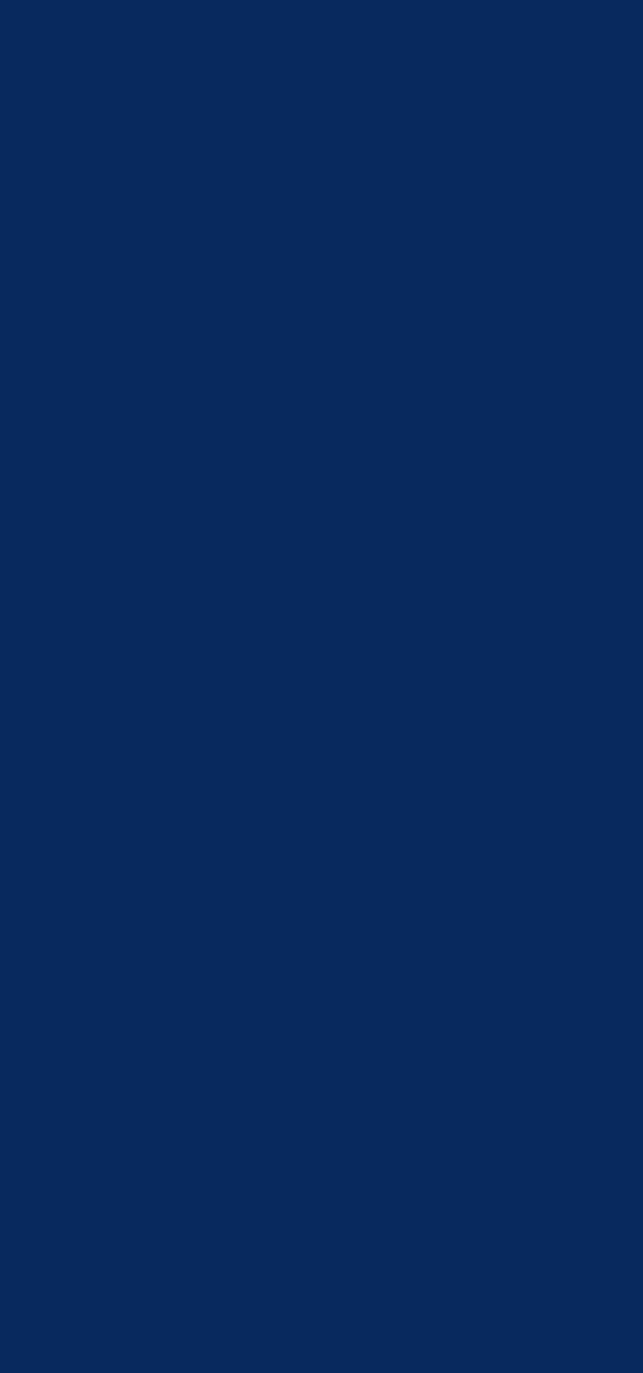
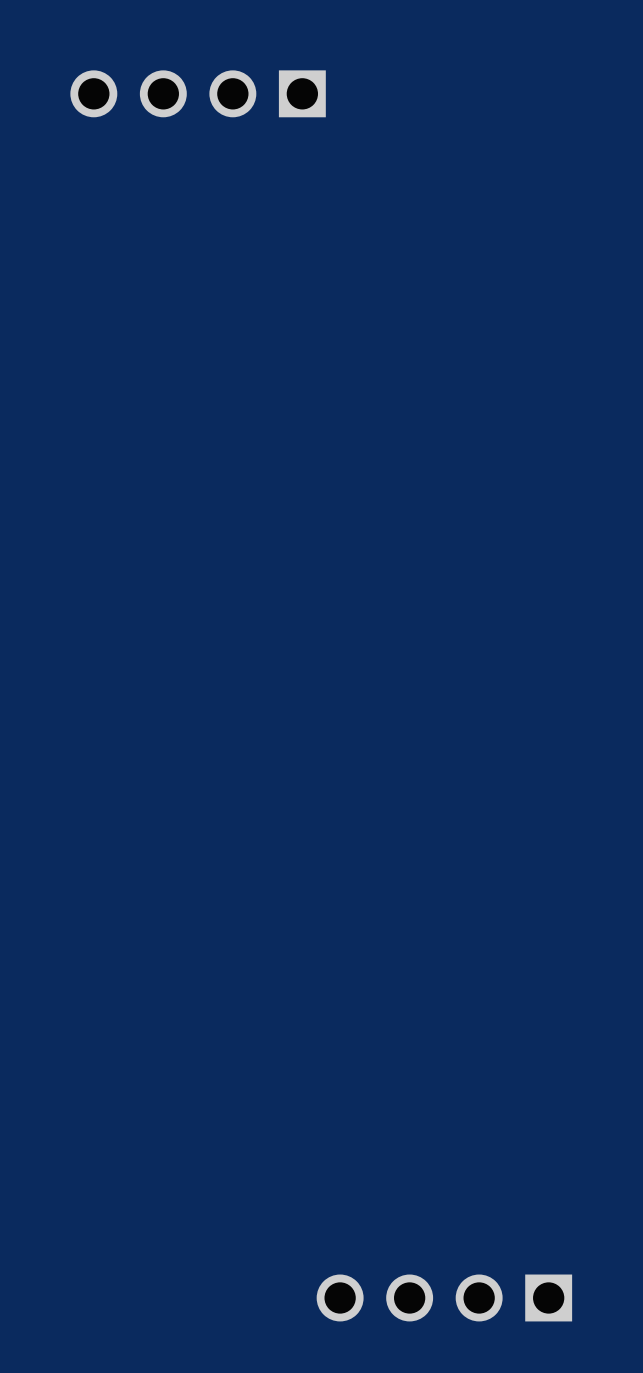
part: none -> (198, 93)
part: none -> (444, 1297)

